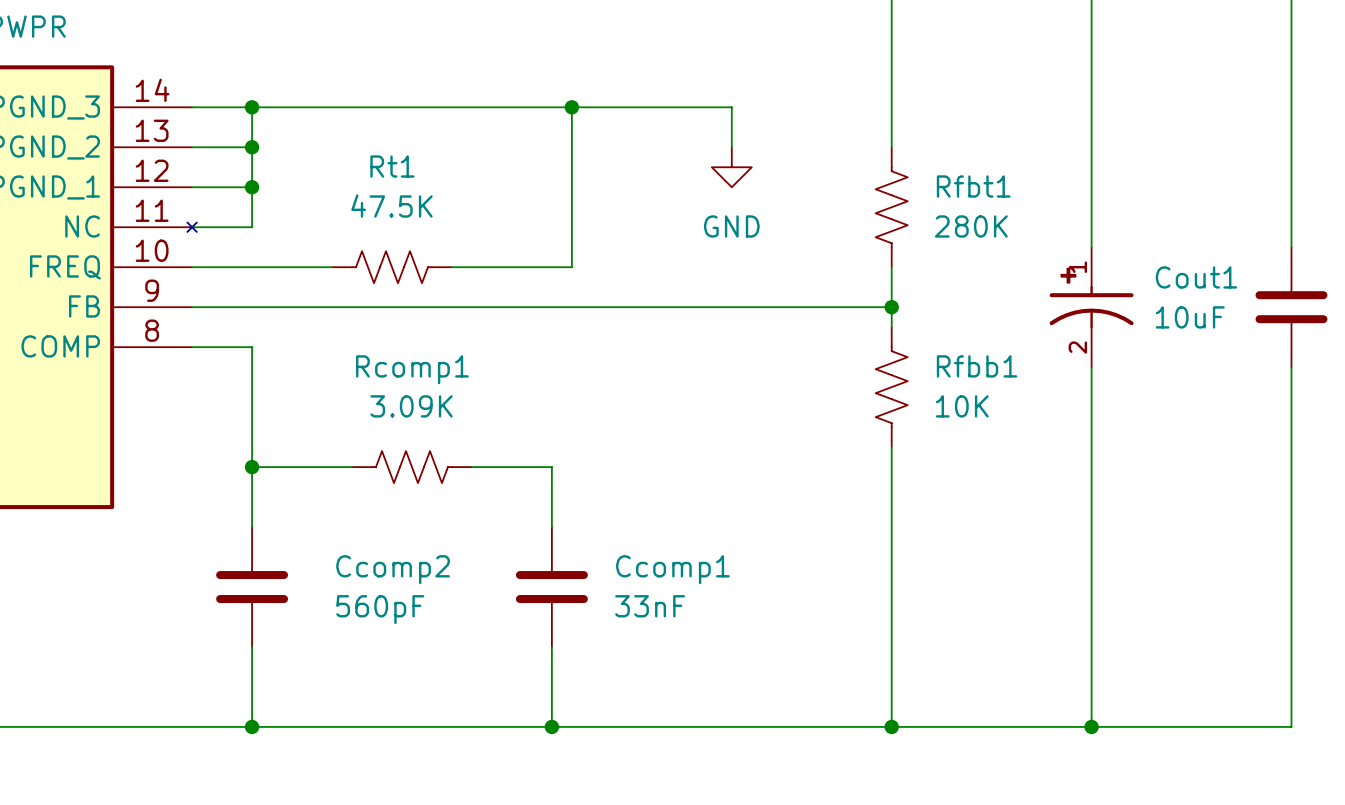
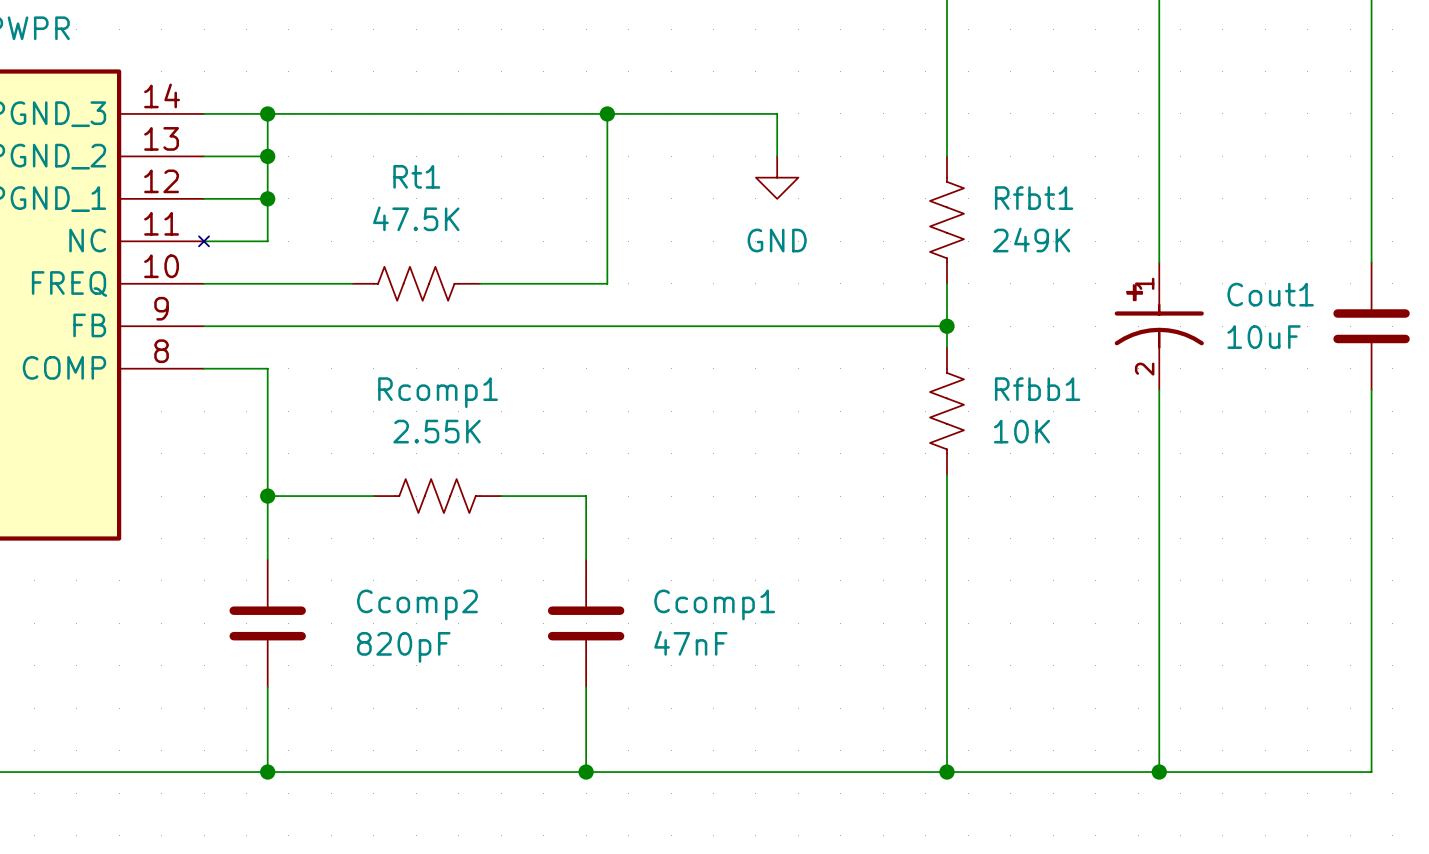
Rfbt1 value: 280K (971, 226) -> 249K (1031, 240)
Rcomp1 value: 3.09K (411, 406) -> 2.55K (437, 431)
Ccomp1 value: 33nF (650, 606) -> 47nF (690, 643)
Ccomp2 value: 560pF (380, 609) -> 820pF (403, 647)

